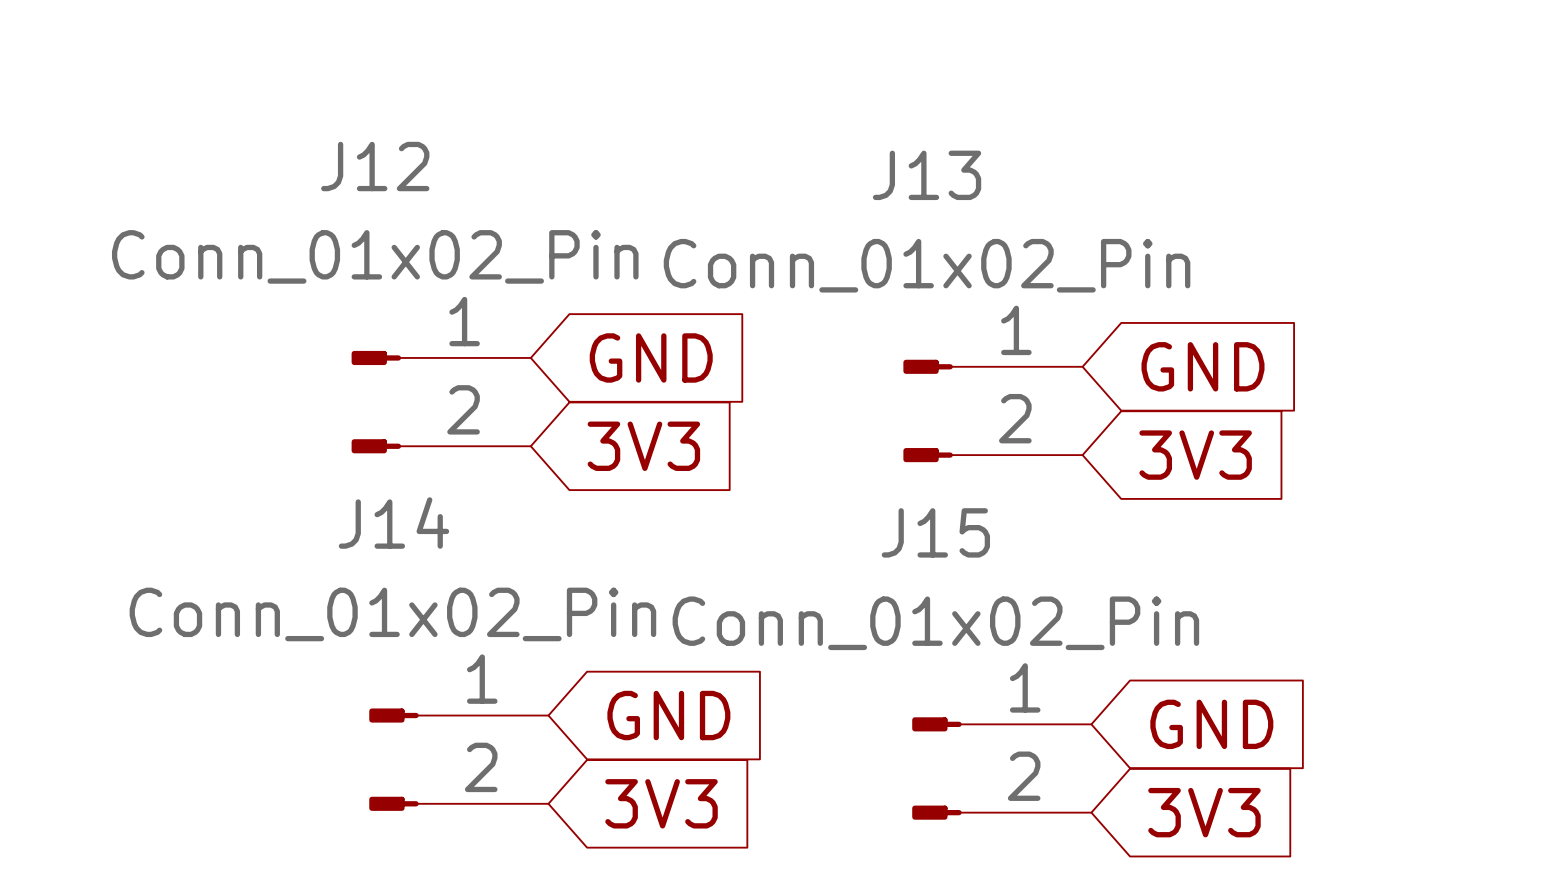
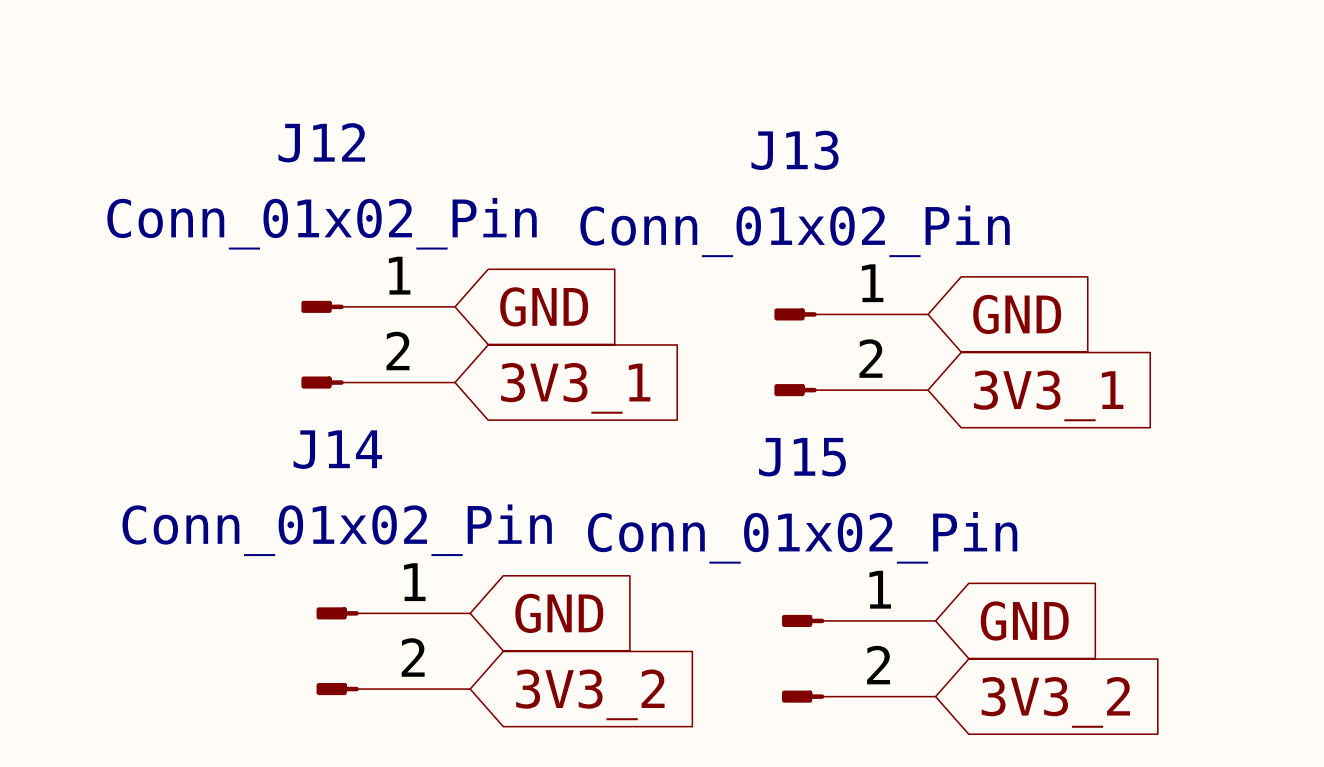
global label: 3V3 (643, 446) -> 3V3_1 (575, 388)
global label: 3V3 (1195, 455) -> 3V3_1 (1048, 395)
global label: 3V3 (661, 803) -> 3V3_2 (590, 694)
global label: 3V3 (1204, 812) -> 3V3_2 (1055, 702)

